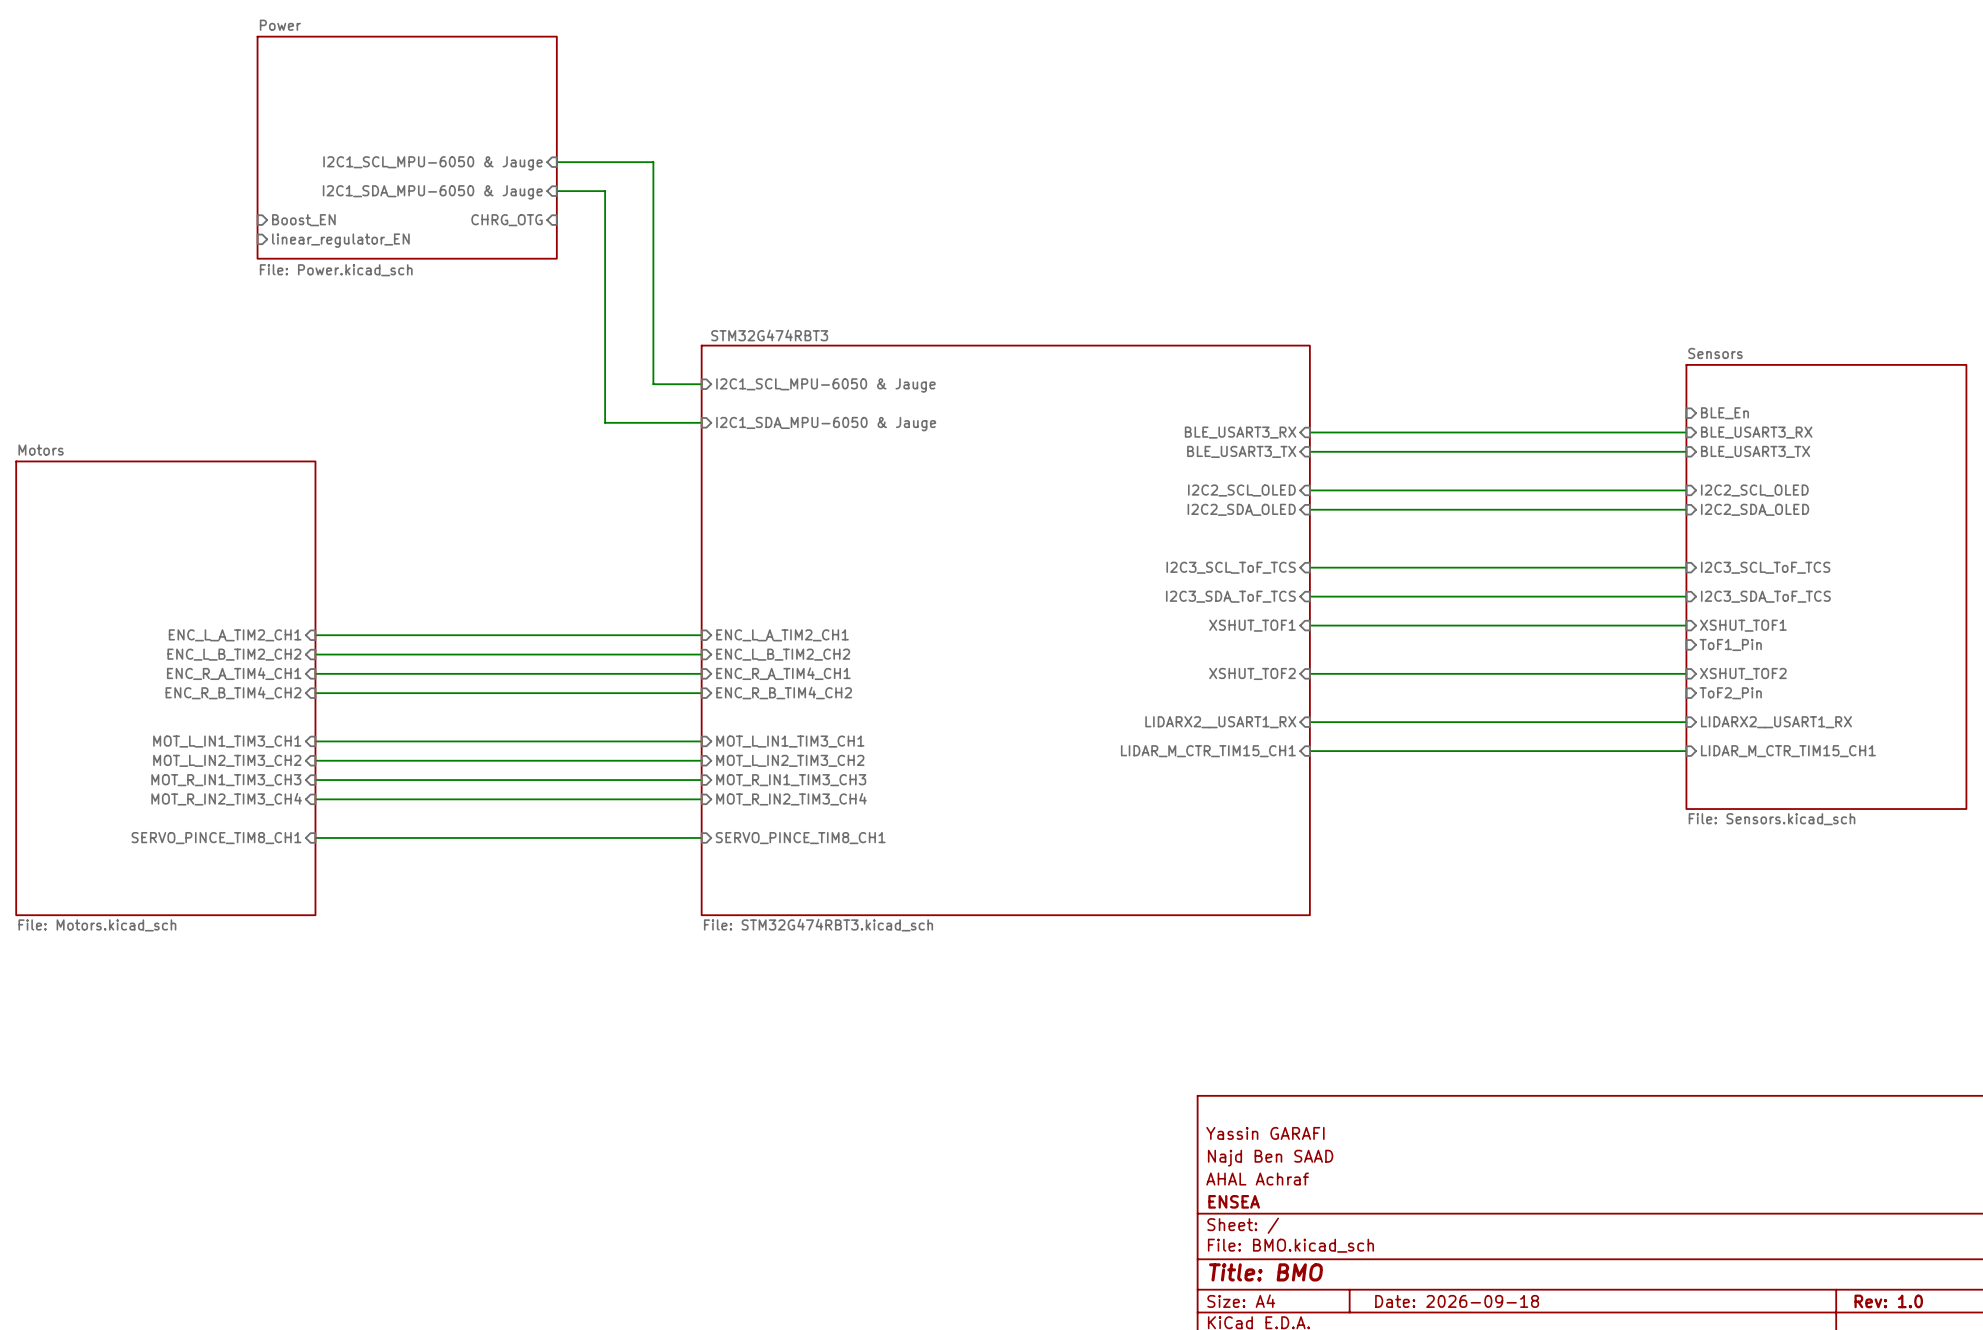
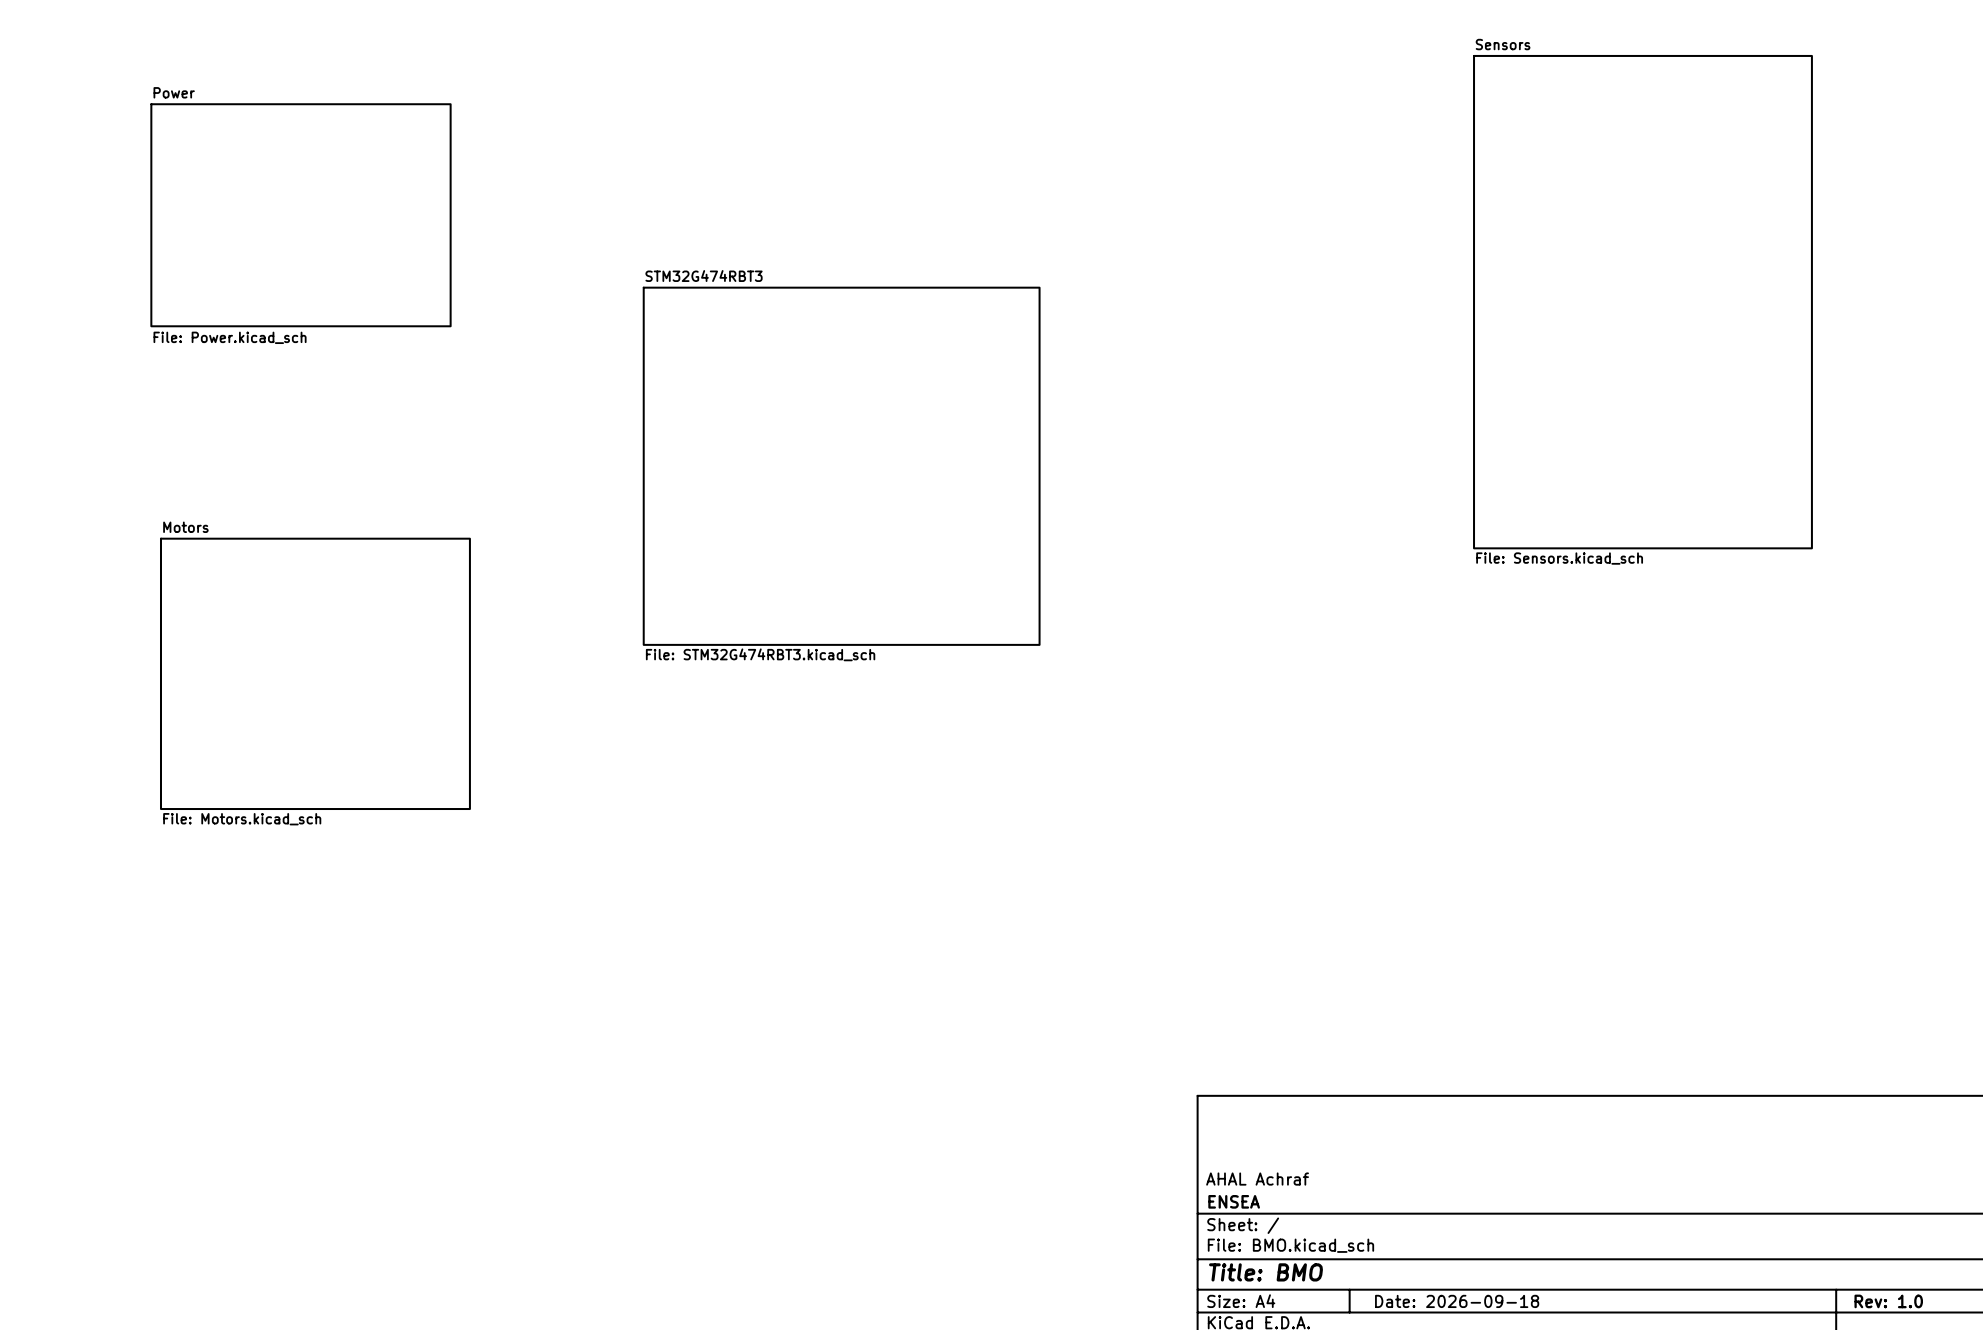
sheet Power position: (407, 147) -> (300, 215)
wire: (556, 162) (653, 162) (653, 384) (701, 384) -> none
sheet pin: I2C1_SCL_MPU-6050 & Jauge (433, 163) -> none
wire: (556, 191) (605, 191) (605, 422) (701, 422) -> none
sheet pin: I2C1_SDA_MPU-6050 & Jauge (432, 192) -> none
sheet pin: Boost_EN (303, 220) -> none
sheet pin: CHRG_OTG (507, 220) -> none
sheet pin: linear_regulator_EN (340, 240) -> none
sheet Sensors: none -> File: Sensors.kicad_sch (1642, 302)
sheet STM32G474RBT3 name position: STM32G474RBT3 (769, 335) -> STM32G474RBT3 (704, 276)
sheet STM32G474RBT3 shape: [701, 345, 1311, 916] -> [643, 287, 1041, 646]
sheet pin: I2C1_SCL_MPU-6050 & Jauge (825, 385) -> none
sheet pin: BLE_En (1724, 413) -> none
sheet pin: I2C1_SDA_MPU-6050 & Jauge (826, 424) -> none
sheet pin: BLE_USART3_RX (1240, 432) -> none
wire: (1309, 432) (1686, 432) -> none
sheet pin: BLE_USART3_RX (1756, 432) -> none
sheet pin: BLE_USART3_TX (1241, 451) -> none
wire: (1309, 451) (1686, 451) -> none
sheet pin: BLE_USART3_TX (1755, 451) -> none
sheet pin: I2C2_SCL_OLED (1241, 490) -> none
wire: (1309, 490) (1686, 490) -> none
sheet pin: I2C2_SCL_OLED (1754, 490) -> none
sheet pin: I2C2_SDA_OLED (1241, 509) -> none
wire: (1309, 509) (1686, 509) -> none
sheet pin: I2C2_SDA_OLED (1755, 509) -> none
sheet pin: I2C3_SCL_ToF_TCS (1231, 567) -> none
wire: (1309, 567) (1686, 567) -> none
sheet pin: I2C3_SCL_ToF_TCS (1765, 567) -> none
sheet Sensors: File: Sensors.kicad_sch (1826, 586) -> none
sheet pin: I2C3_SDA_ToF_TCS (1230, 596) -> none
wire: (1309, 596) (1686, 596) -> none
sheet pin: I2C3_SDA_ToF_TCS (1765, 596) -> none
sheet pin: XSHUT_TOF1 (1252, 625) -> none
wire: (1309, 625) (1686, 625) -> none
sheet pin: XSHUT_TOF1 (1743, 625) -> none
sheet pin: ENC_L_A_TIM2_CH1 (235, 635) -> none
wire: (315, 635) (701, 635) -> none
sheet pin: ENC_L_A_TIM2_CH1 (782, 635) -> none
sheet pin: ToF1_Pin (1730, 644) -> none
sheet pin: ENC_L_B_TIM2_CH2 (234, 654) -> none
wire: (315, 654) (701, 654) -> none
sheet pin: ENC_L_B_TIM2_CH2 (783, 654) -> none
sheet pin: ENC_R_A_TIM4_CH1 (234, 673) -> none
wire: (315, 673) (701, 673) -> none
sheet Motors: none -> File: Motors.kicad_sch (315, 673)
sheet pin: ENC_R_A_TIM4_CH1 (783, 673) -> none
sheet pin: XSHUT_TOF2 (1252, 673) -> none
wire: (1309, 673) (1686, 673) -> none
sheet pin: XSHUT_TOF2 (1743, 673) -> none
sheet Motors: File: Motors.kicad_sch (165, 688) -> none
sheet pin: ENC_R_B_TIM4_CH2 (233, 693) -> none
wire: (315, 693) (701, 693) -> none
sheet pin: ENC_R_B_TIM4_CH2 (784, 693) -> none
sheet pin: ToF2_Pin (1730, 693) -> none
sheet pin: LIDARX2__USART1_RX (1220, 722) -> none
wire: (1309, 722) (1686, 722) -> none
sheet pin: LIDARX2__USART1_RX (1776, 722) -> none
sheet pin: MOT_L_IN1_TIM3_CH1 (227, 741) -> none
wire: (315, 741) (701, 741) -> none
sheet pin: MOT_L_IN1_TIM3_CH1 (790, 741) -> none
sheet pin: LIDAR_M_CTR_TIM15_CH1 (1208, 751) -> none
wire: (1309, 751) (1686, 751) -> none
sheet pin: LIDAR_M_CTR_TIM15_CH1 (1788, 751) -> none
sheet pin: MOT_L_IN2_TIM3_CH2 (227, 760) -> none
wire: (315, 760) (701, 760) -> none
sheet pin: MOT_L_IN2_TIM3_CH2 (790, 760) -> none
sheet pin: MOT_R_IN1_TIM3_CH3 (226, 780) -> none
wire: (315, 780) (701, 780) -> none
sheet pin: MOT_R_IN1_TIM3_CH3 (791, 780) -> none
sheet pin: MOT_R_IN2_TIM3_CH4 (226, 799) -> none
wire: (315, 799) (701, 799) -> none
sheet pin: MOT_R_IN2_TIM3_CH4 (791, 799) -> none
wire: (315, 837) (701, 837) -> none
sheet pin: SERVO_PINCE_TIM8_CH1 (216, 838) -> none
sheet pin: SERVO_PINCE_TIM8_CH1 (800, 838) -> none
sheet STM32G474RBT3 value position: File: STM32G474RBT3.kicad_sch (818, 925) -> File: STM32G474RBT3.kicad_sch (760, 654)
title block: Yassin GARAFI (1265, 1133) -> none
title block: Najd Ben SAAD (1270, 1158) -> none

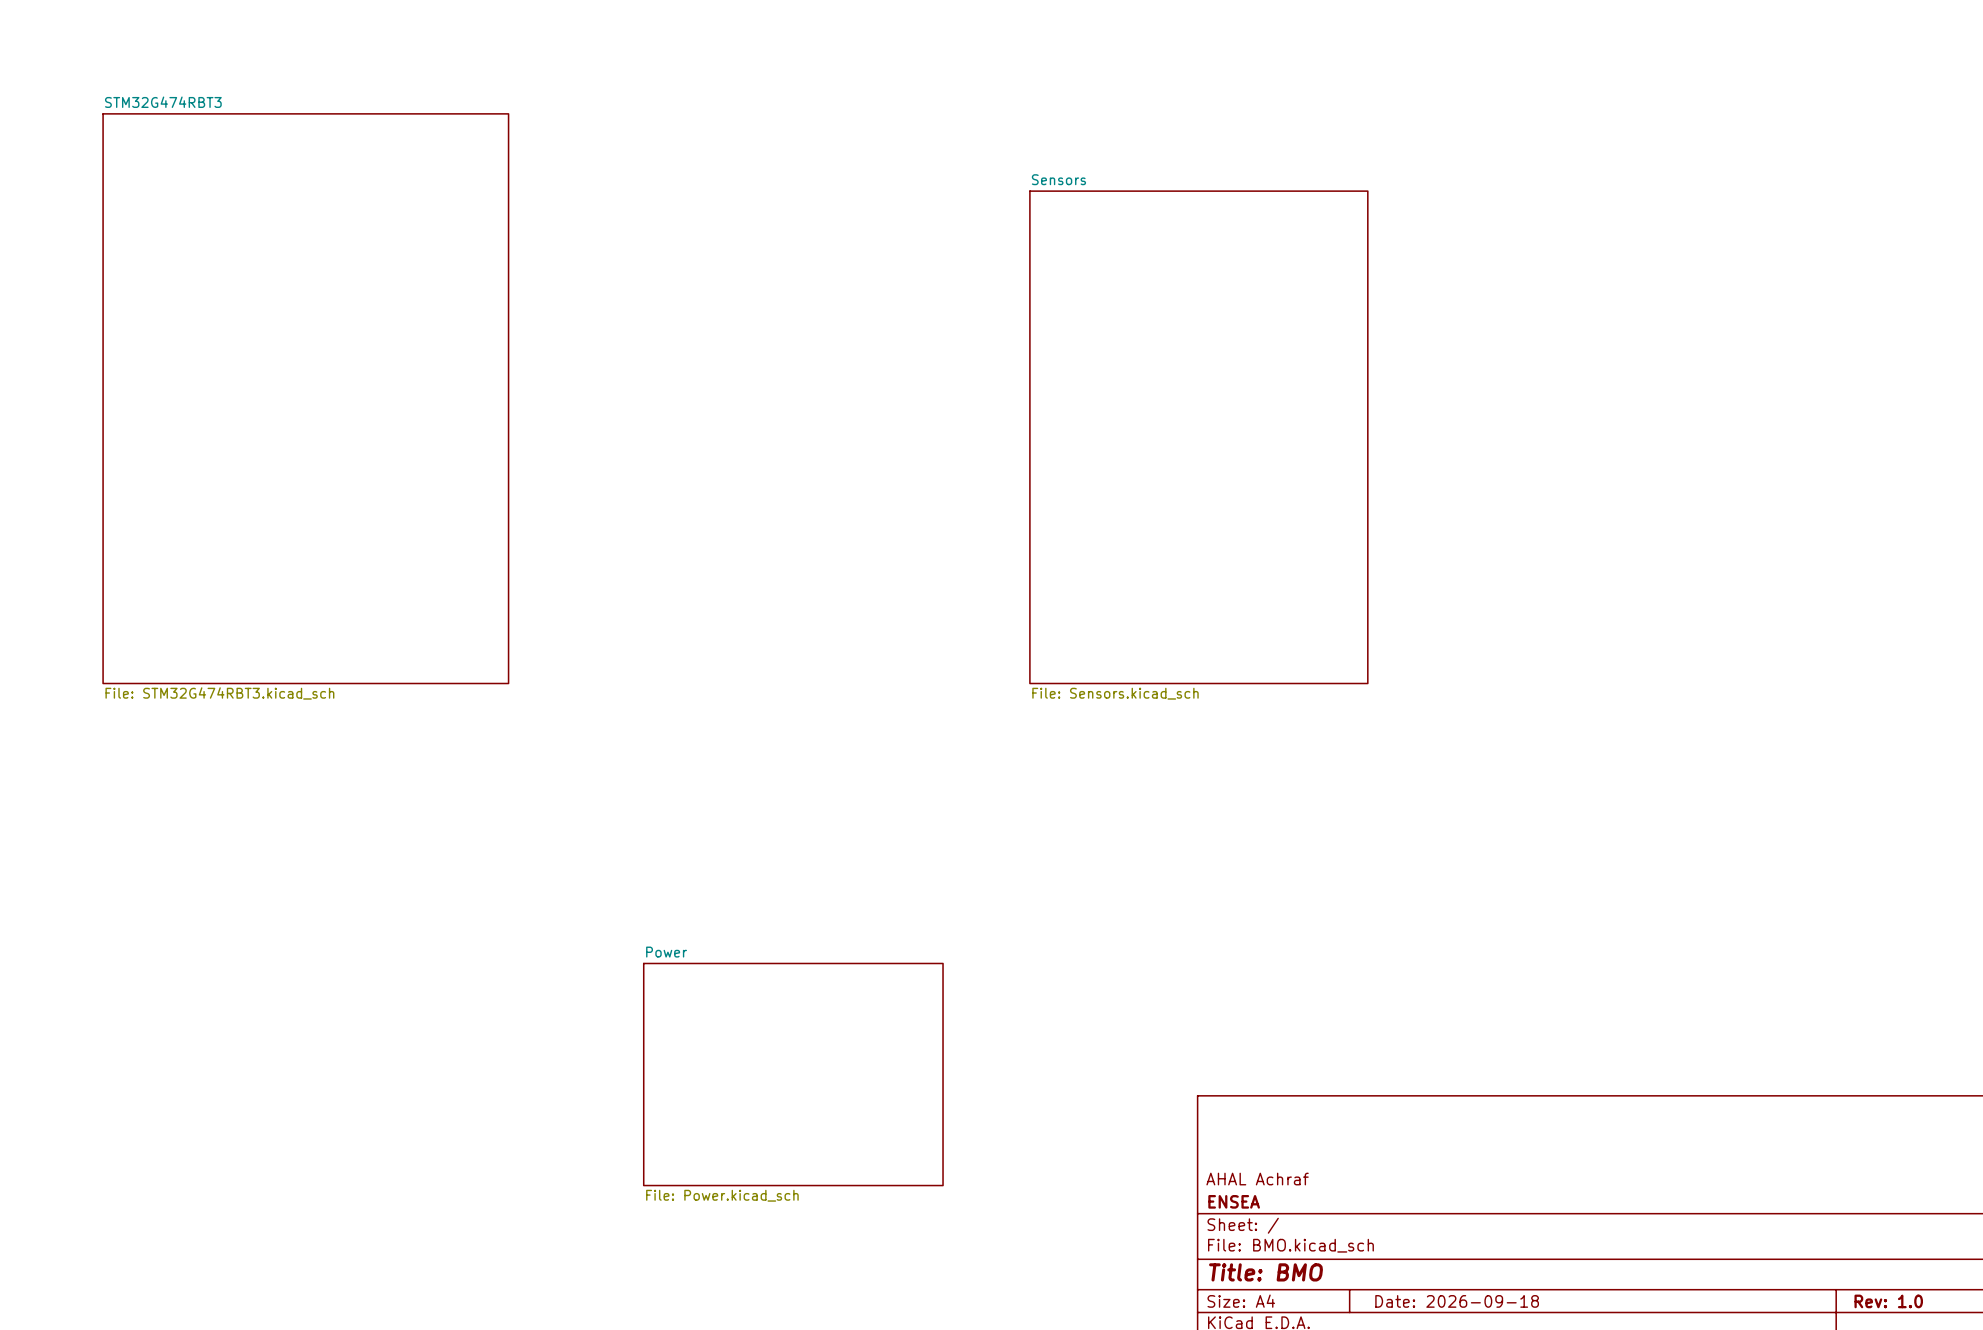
sheet Power: File: Power.kicad_sch (300, 215) -> none
sheet STM32G474RBT3 name position: STM32G474RBT3 (704, 276) -> STM32G474RBT3 (163, 102)
sheet STM32G474RBT3 shape: [643, 287, 1041, 646] -> [102, 113, 510, 685]
sheet Sensors: File: Sensors.kicad_sch (1642, 302) -> none
sheet Sensors: none -> File: Sensors.kicad_sch (1198, 437)
sheet STM32G474RBT3 value position: File: STM32G474RBT3.kicad_sch (760, 654) -> File: STM32G474RBT3.kicad_sch (219, 693)
sheet Motors: File: Motors.kicad_sch (315, 673) -> none
sheet Power: none -> File: Power.kicad_sch (793, 1074)

